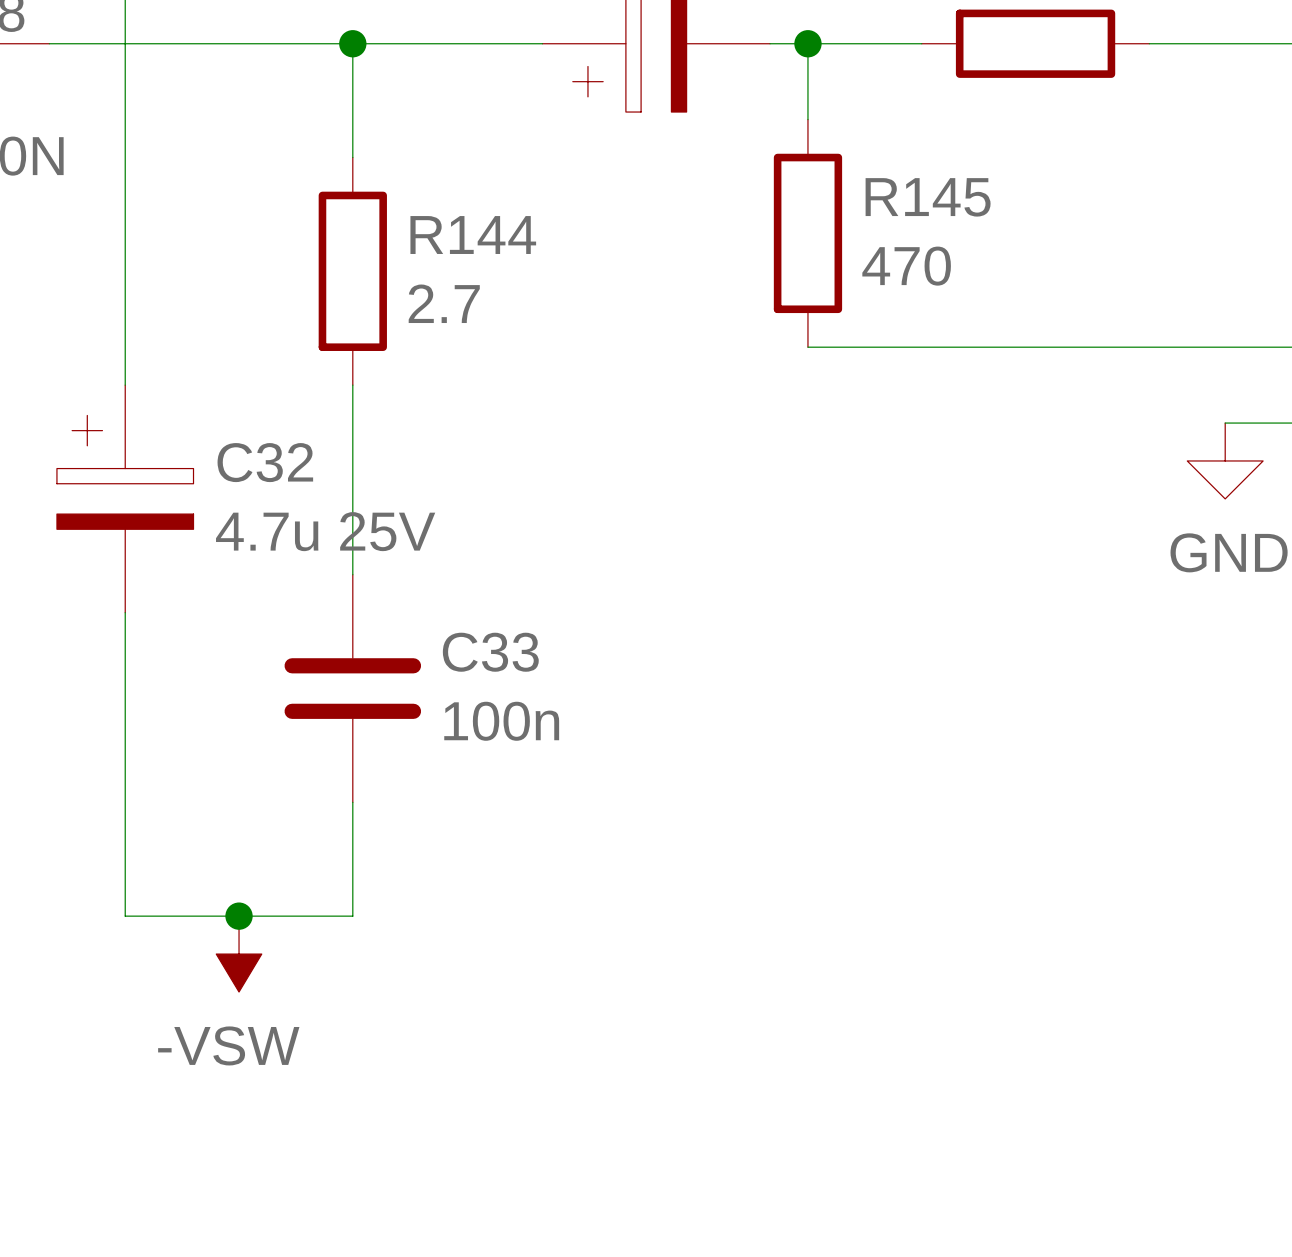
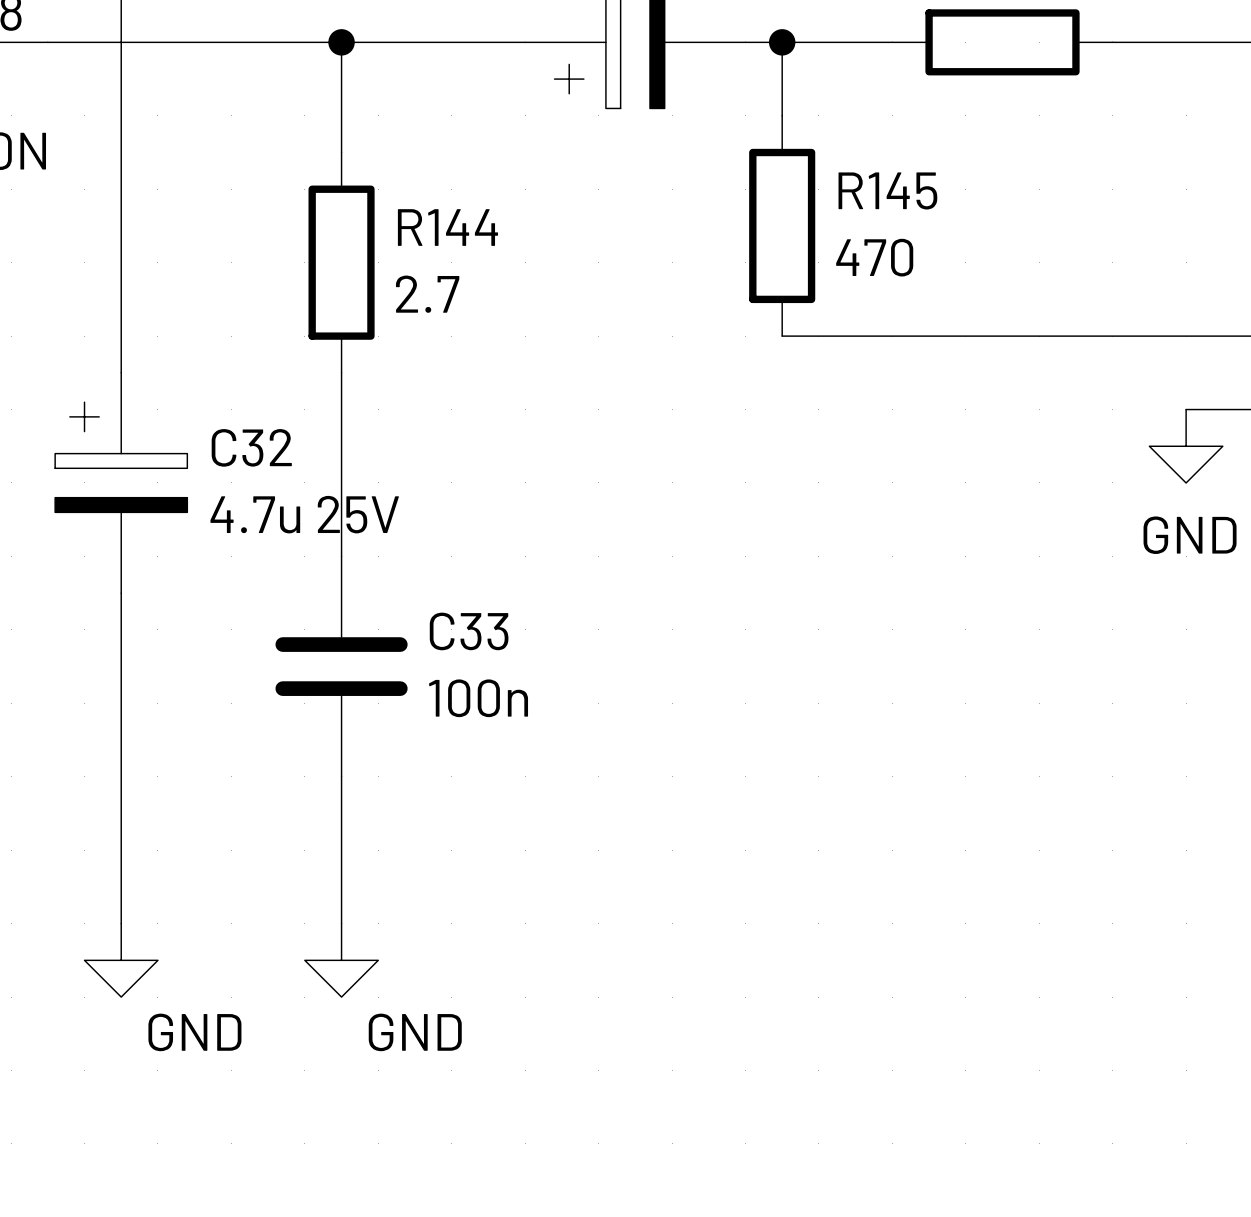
wire: (125, 916) (352, 916) -> (121, 886) (121, 923)
junction: (239, 916) -> none
wire: none -> (341, 886) (341, 923)
power symbol: -VSW (239, 954) -> none
power symbol: none -> GND (121, 960)
power symbol: none -> GND (341, 960)

